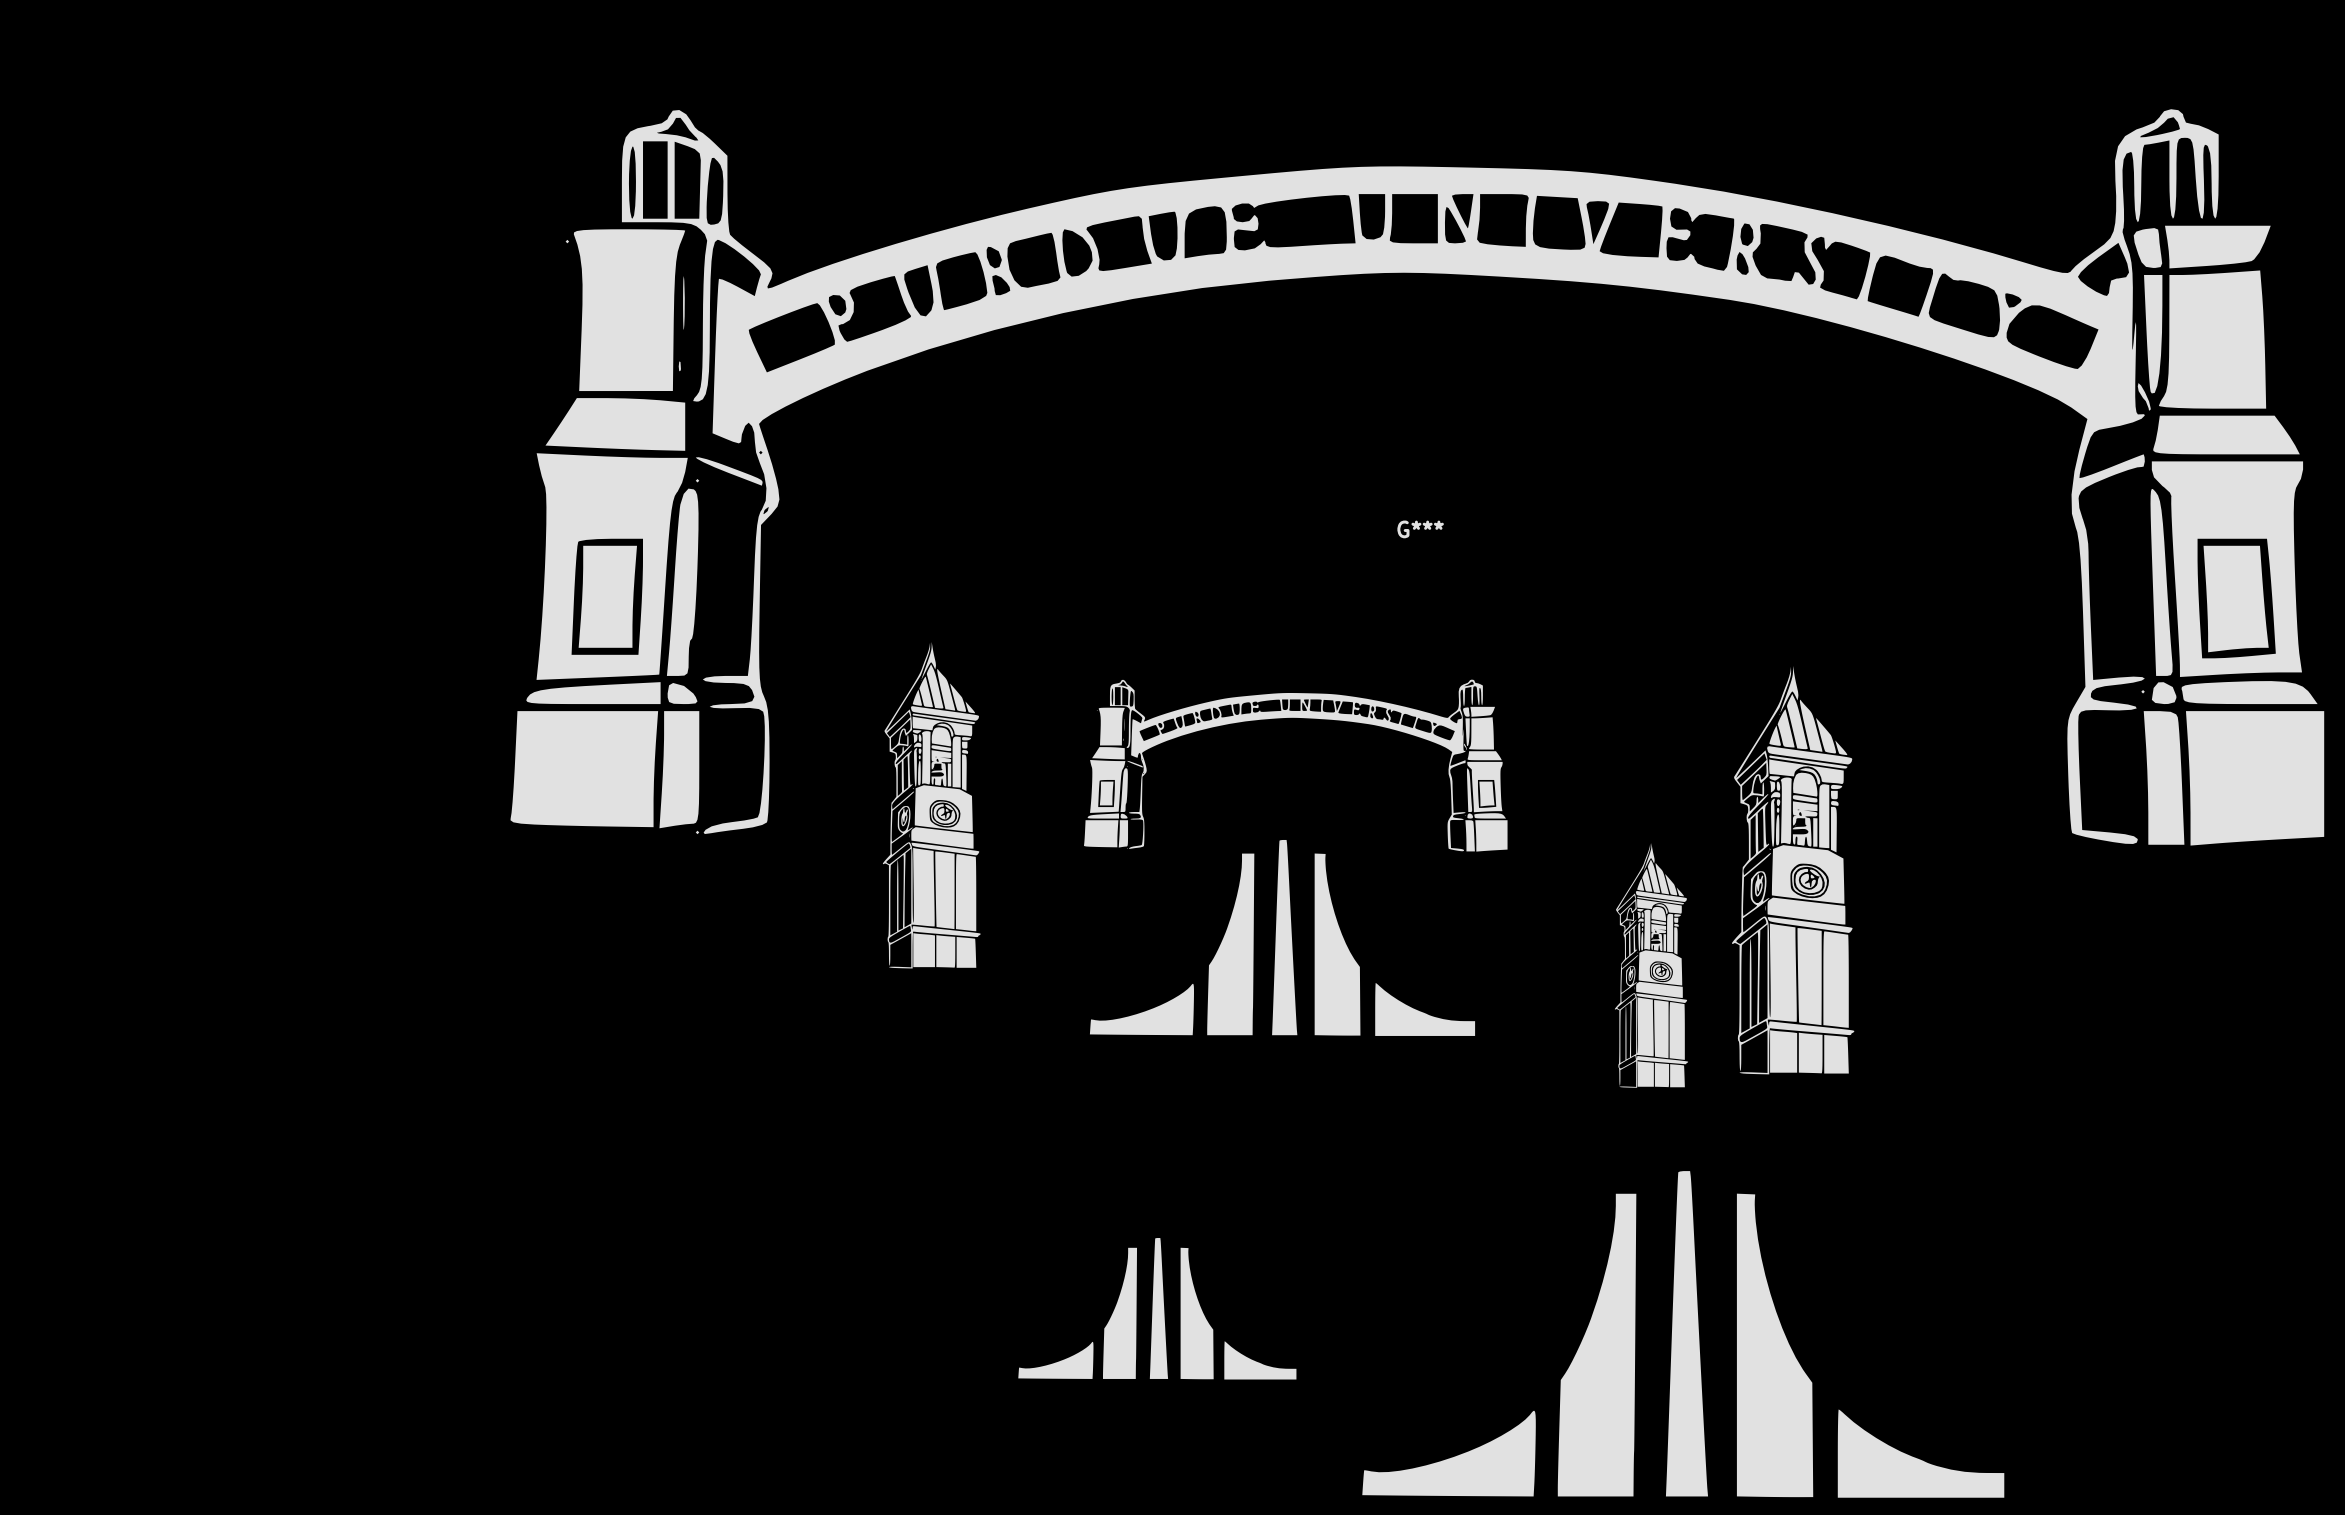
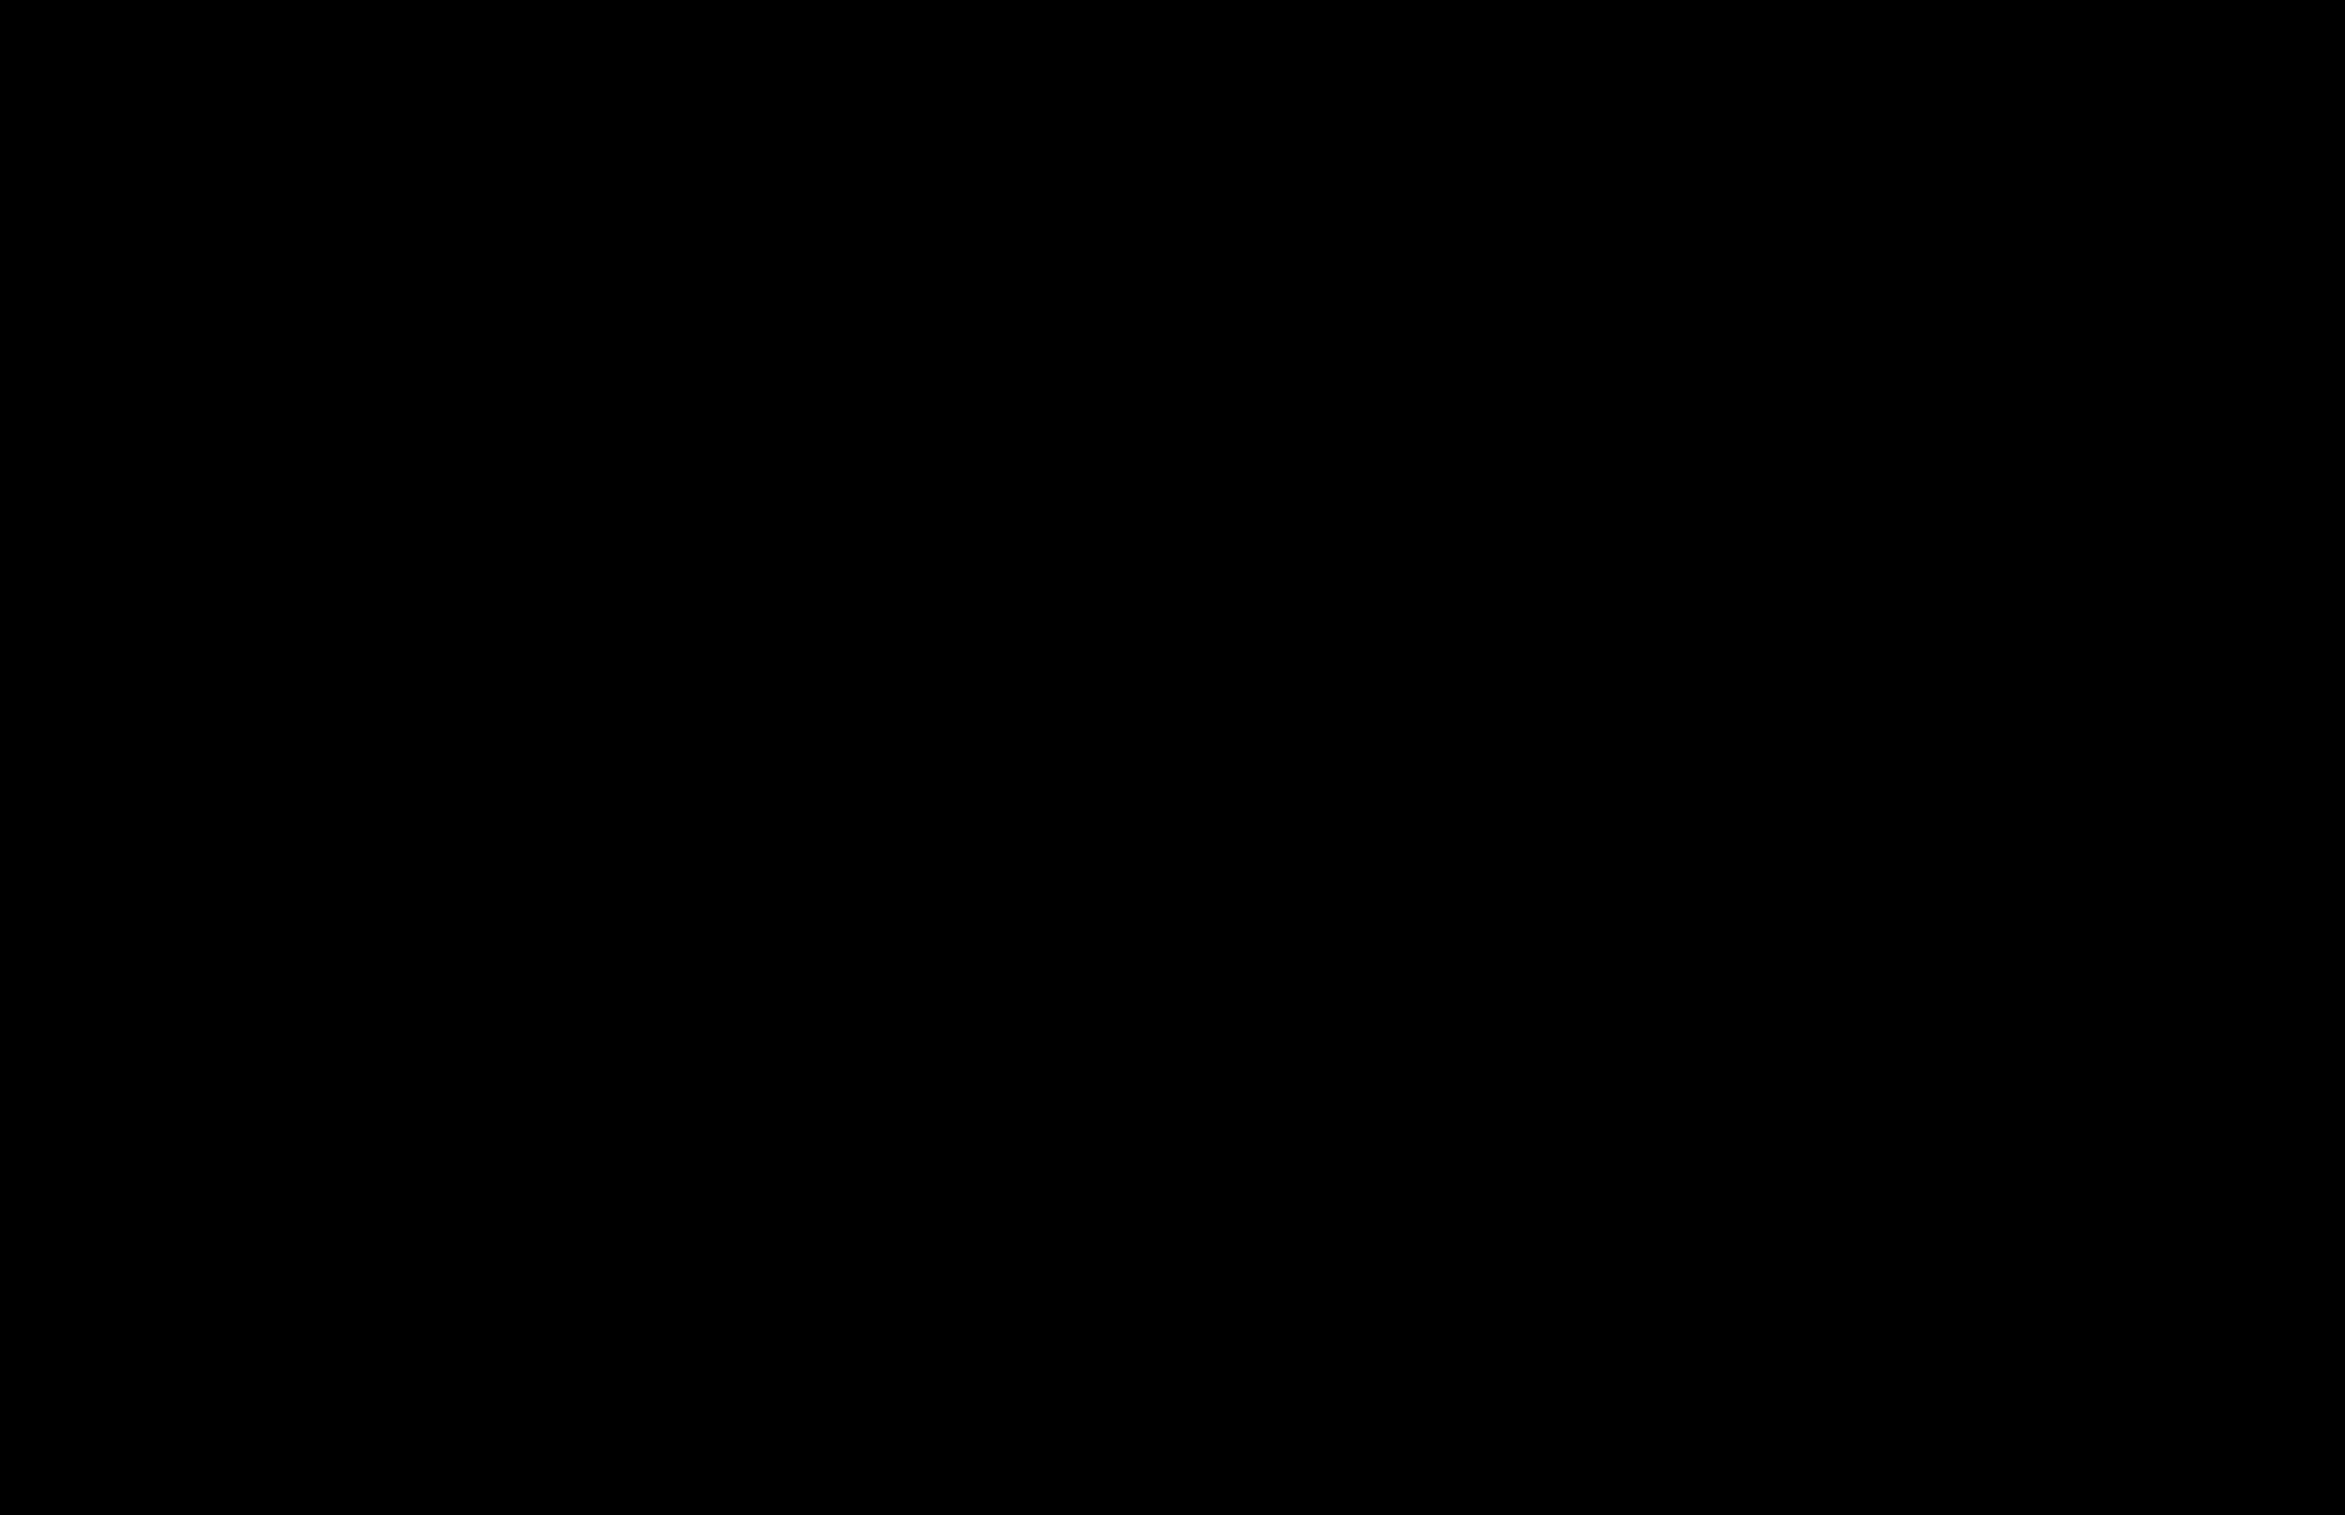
G***: (1417, 477) -> none
drawing: [882, 641, 981, 969] -> none
drawing: [1731, 665, 1855, 1075] -> none
drawing: [1083, 679, 1508, 1036] -> none
drawing: [1614, 842, 1689, 1088] -> none
drawing: [1362, 1171, 2005, 1498] -> none
drawing: [1018, 1237, 1297, 1380] -> none

